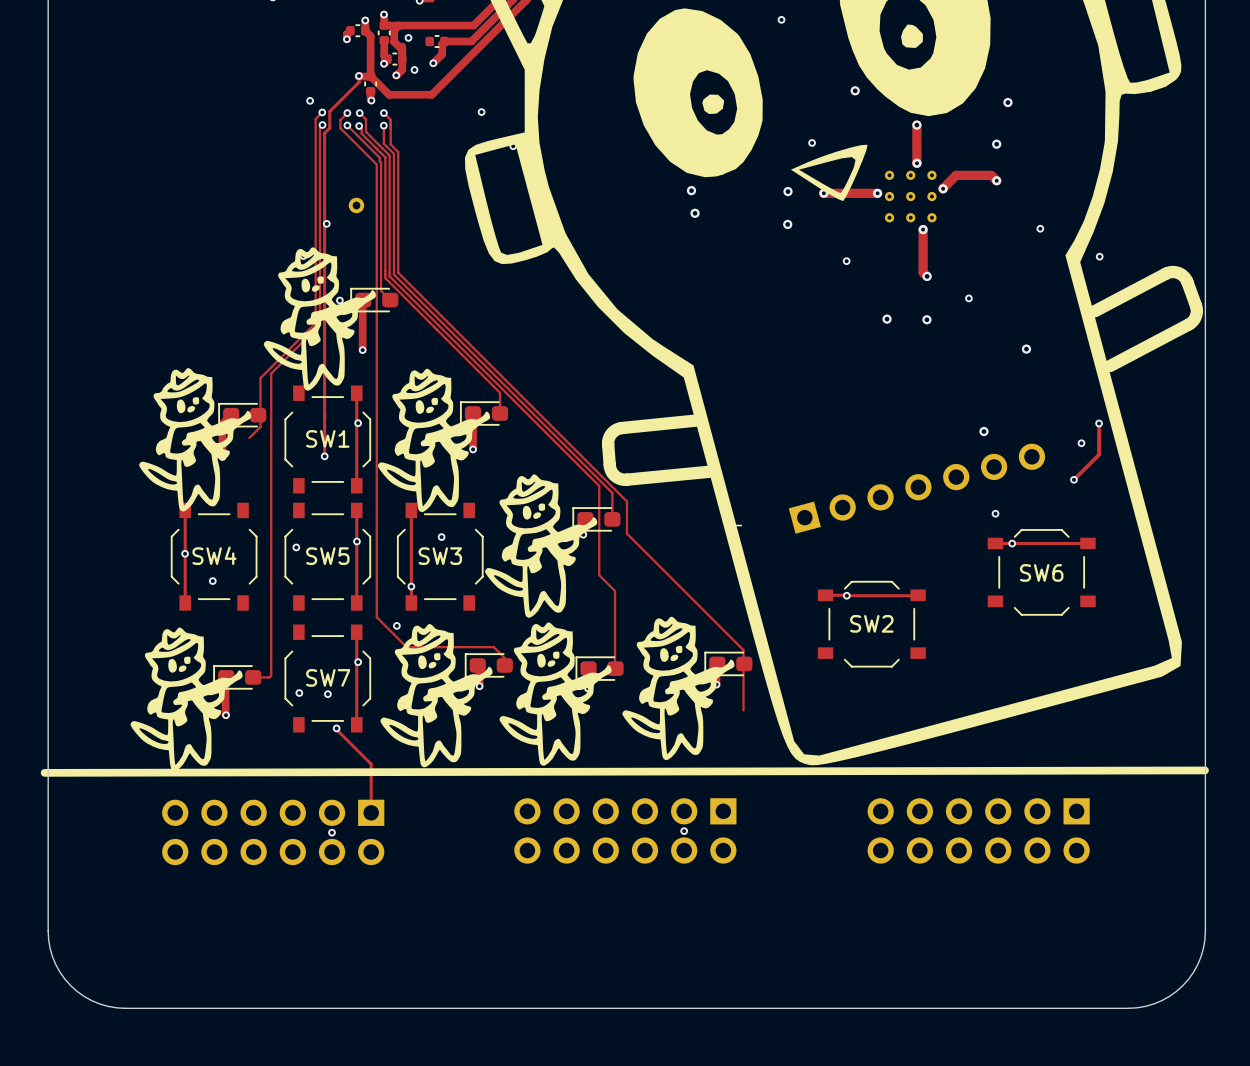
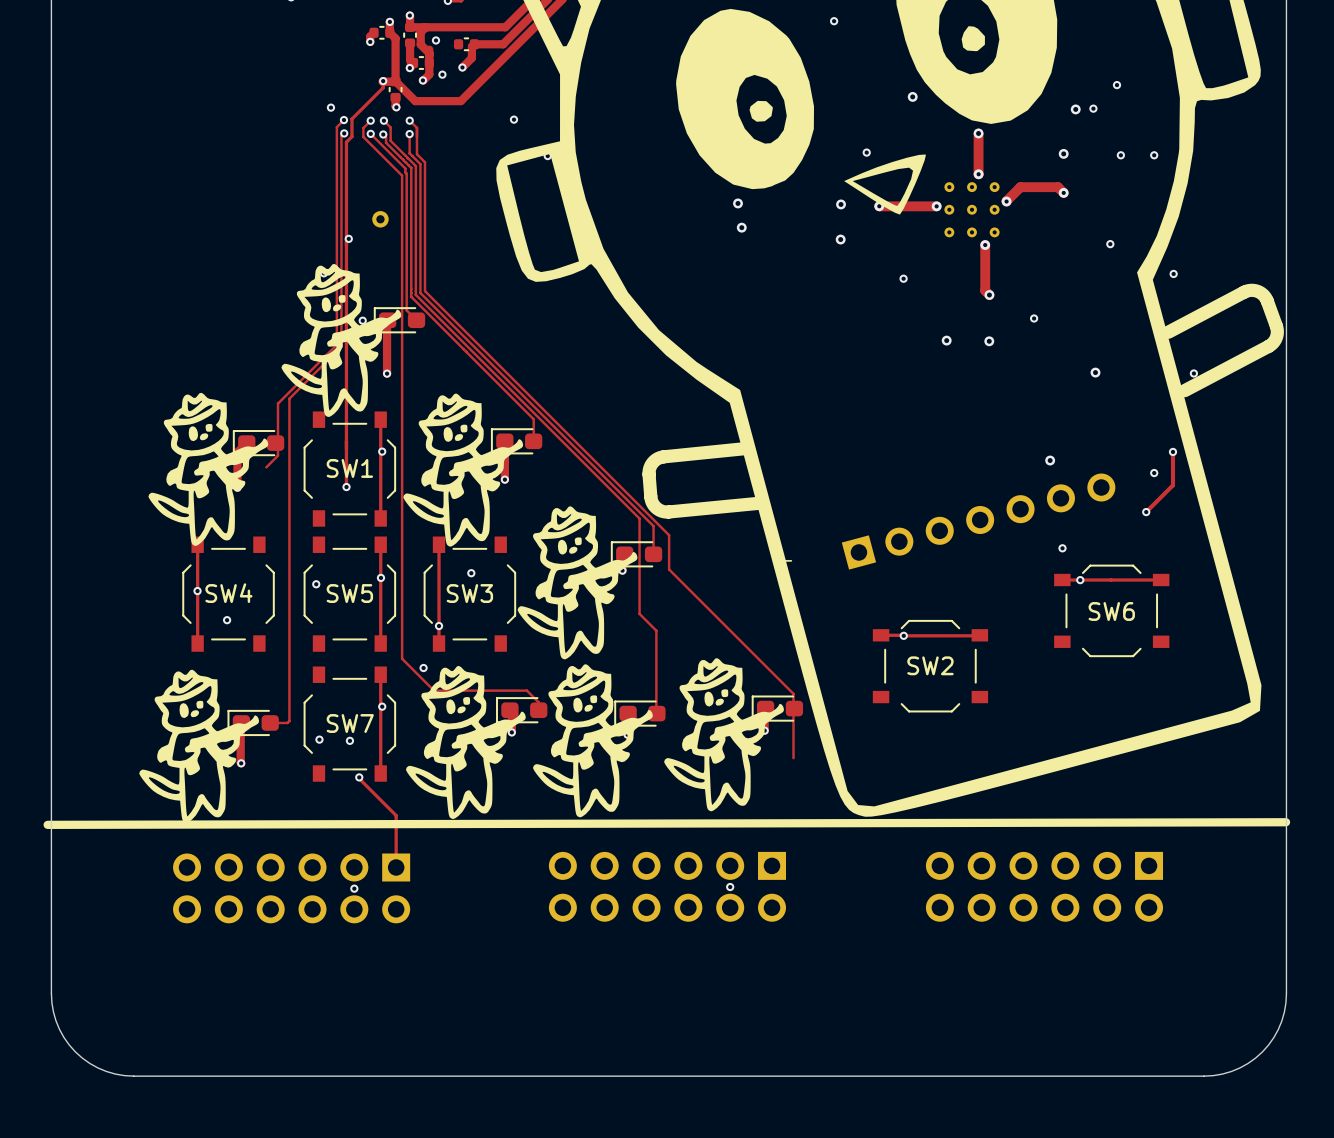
via: none -> (1116, 85)
via: none -> (1093, 108)
via: none -> (1120, 155)
via: none -> (1154, 155)
via: none -> (1193, 373)

